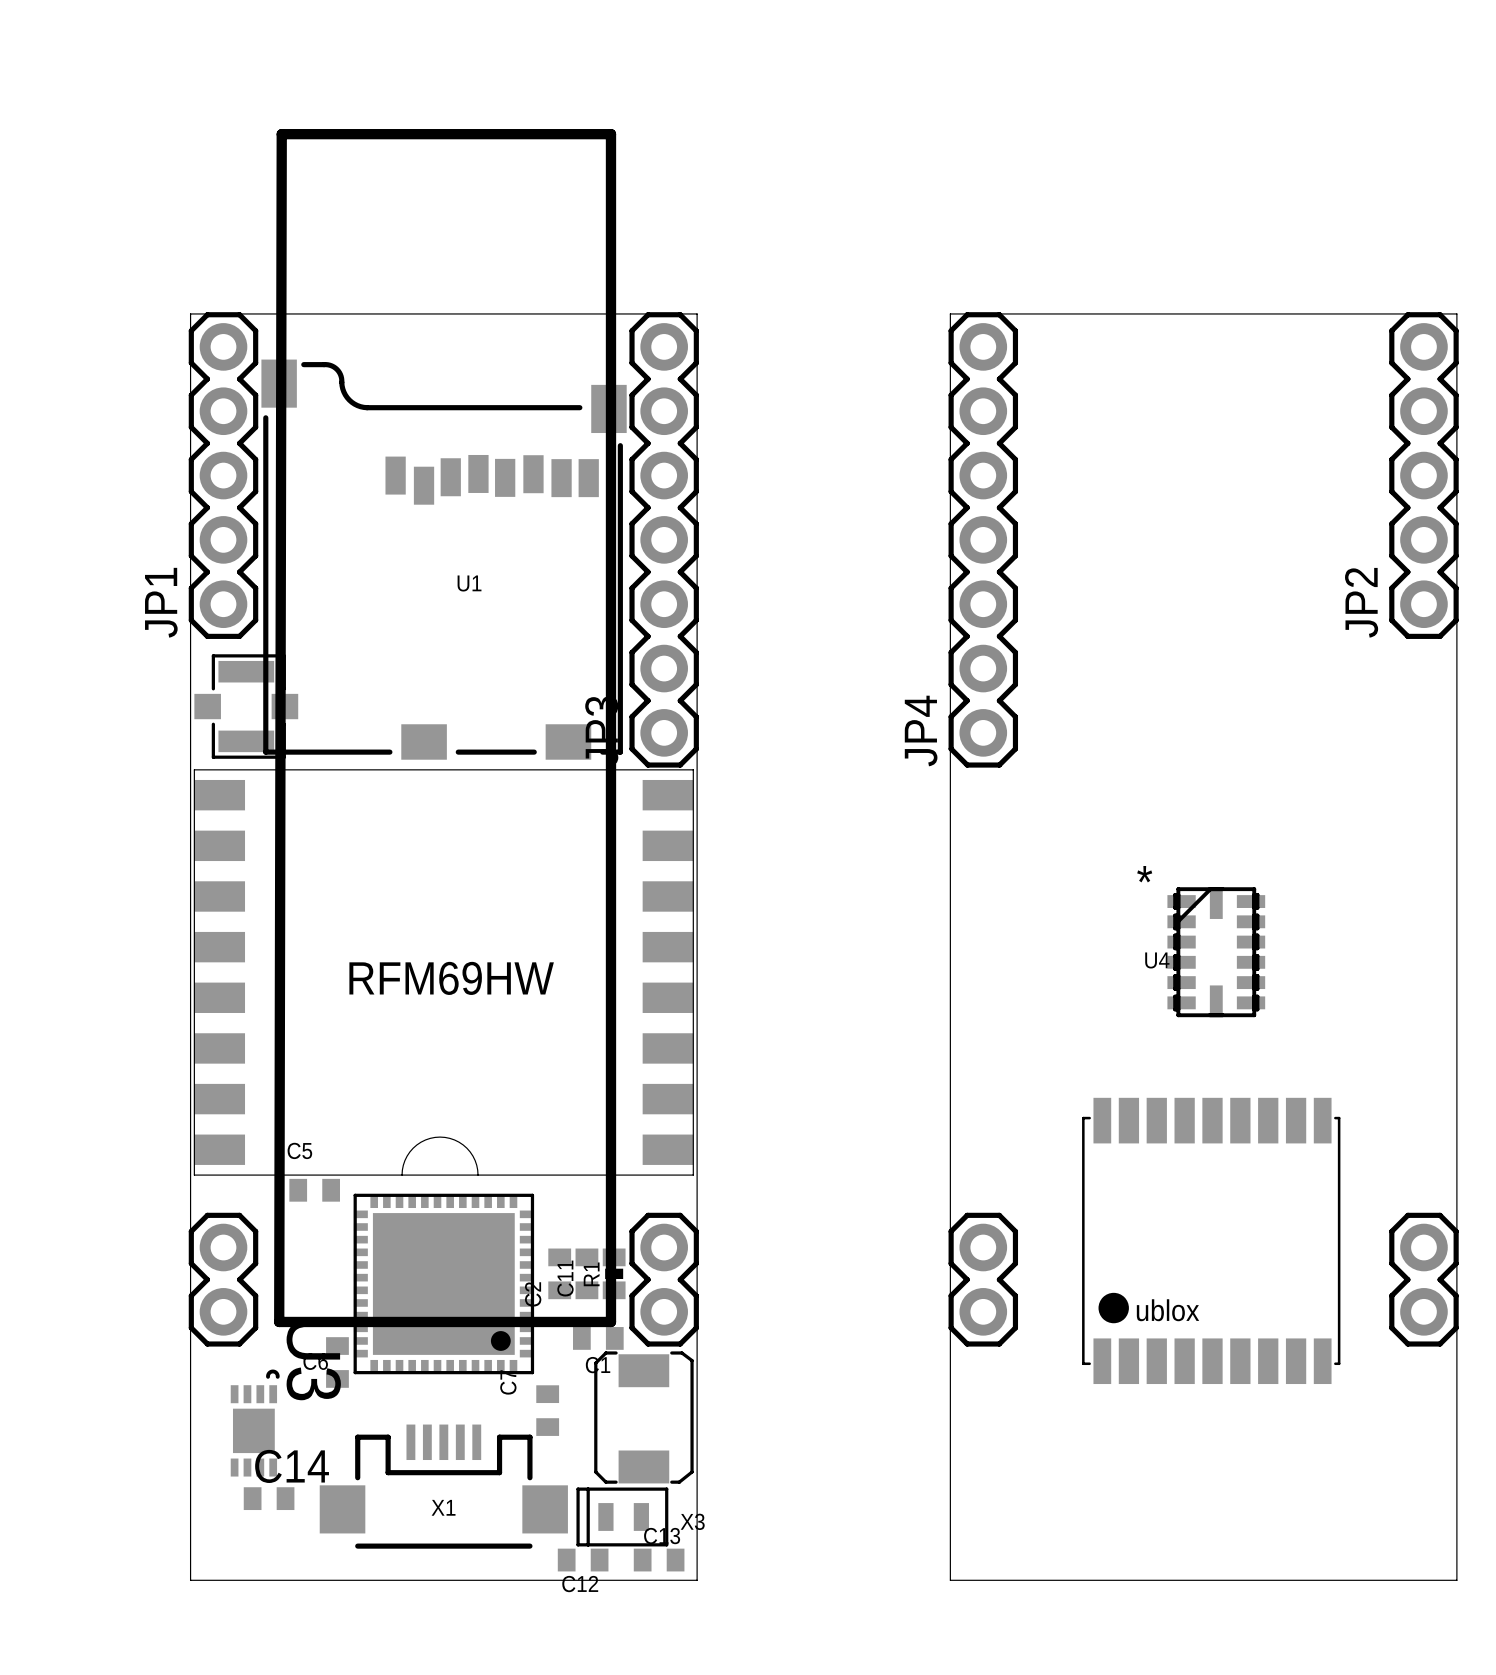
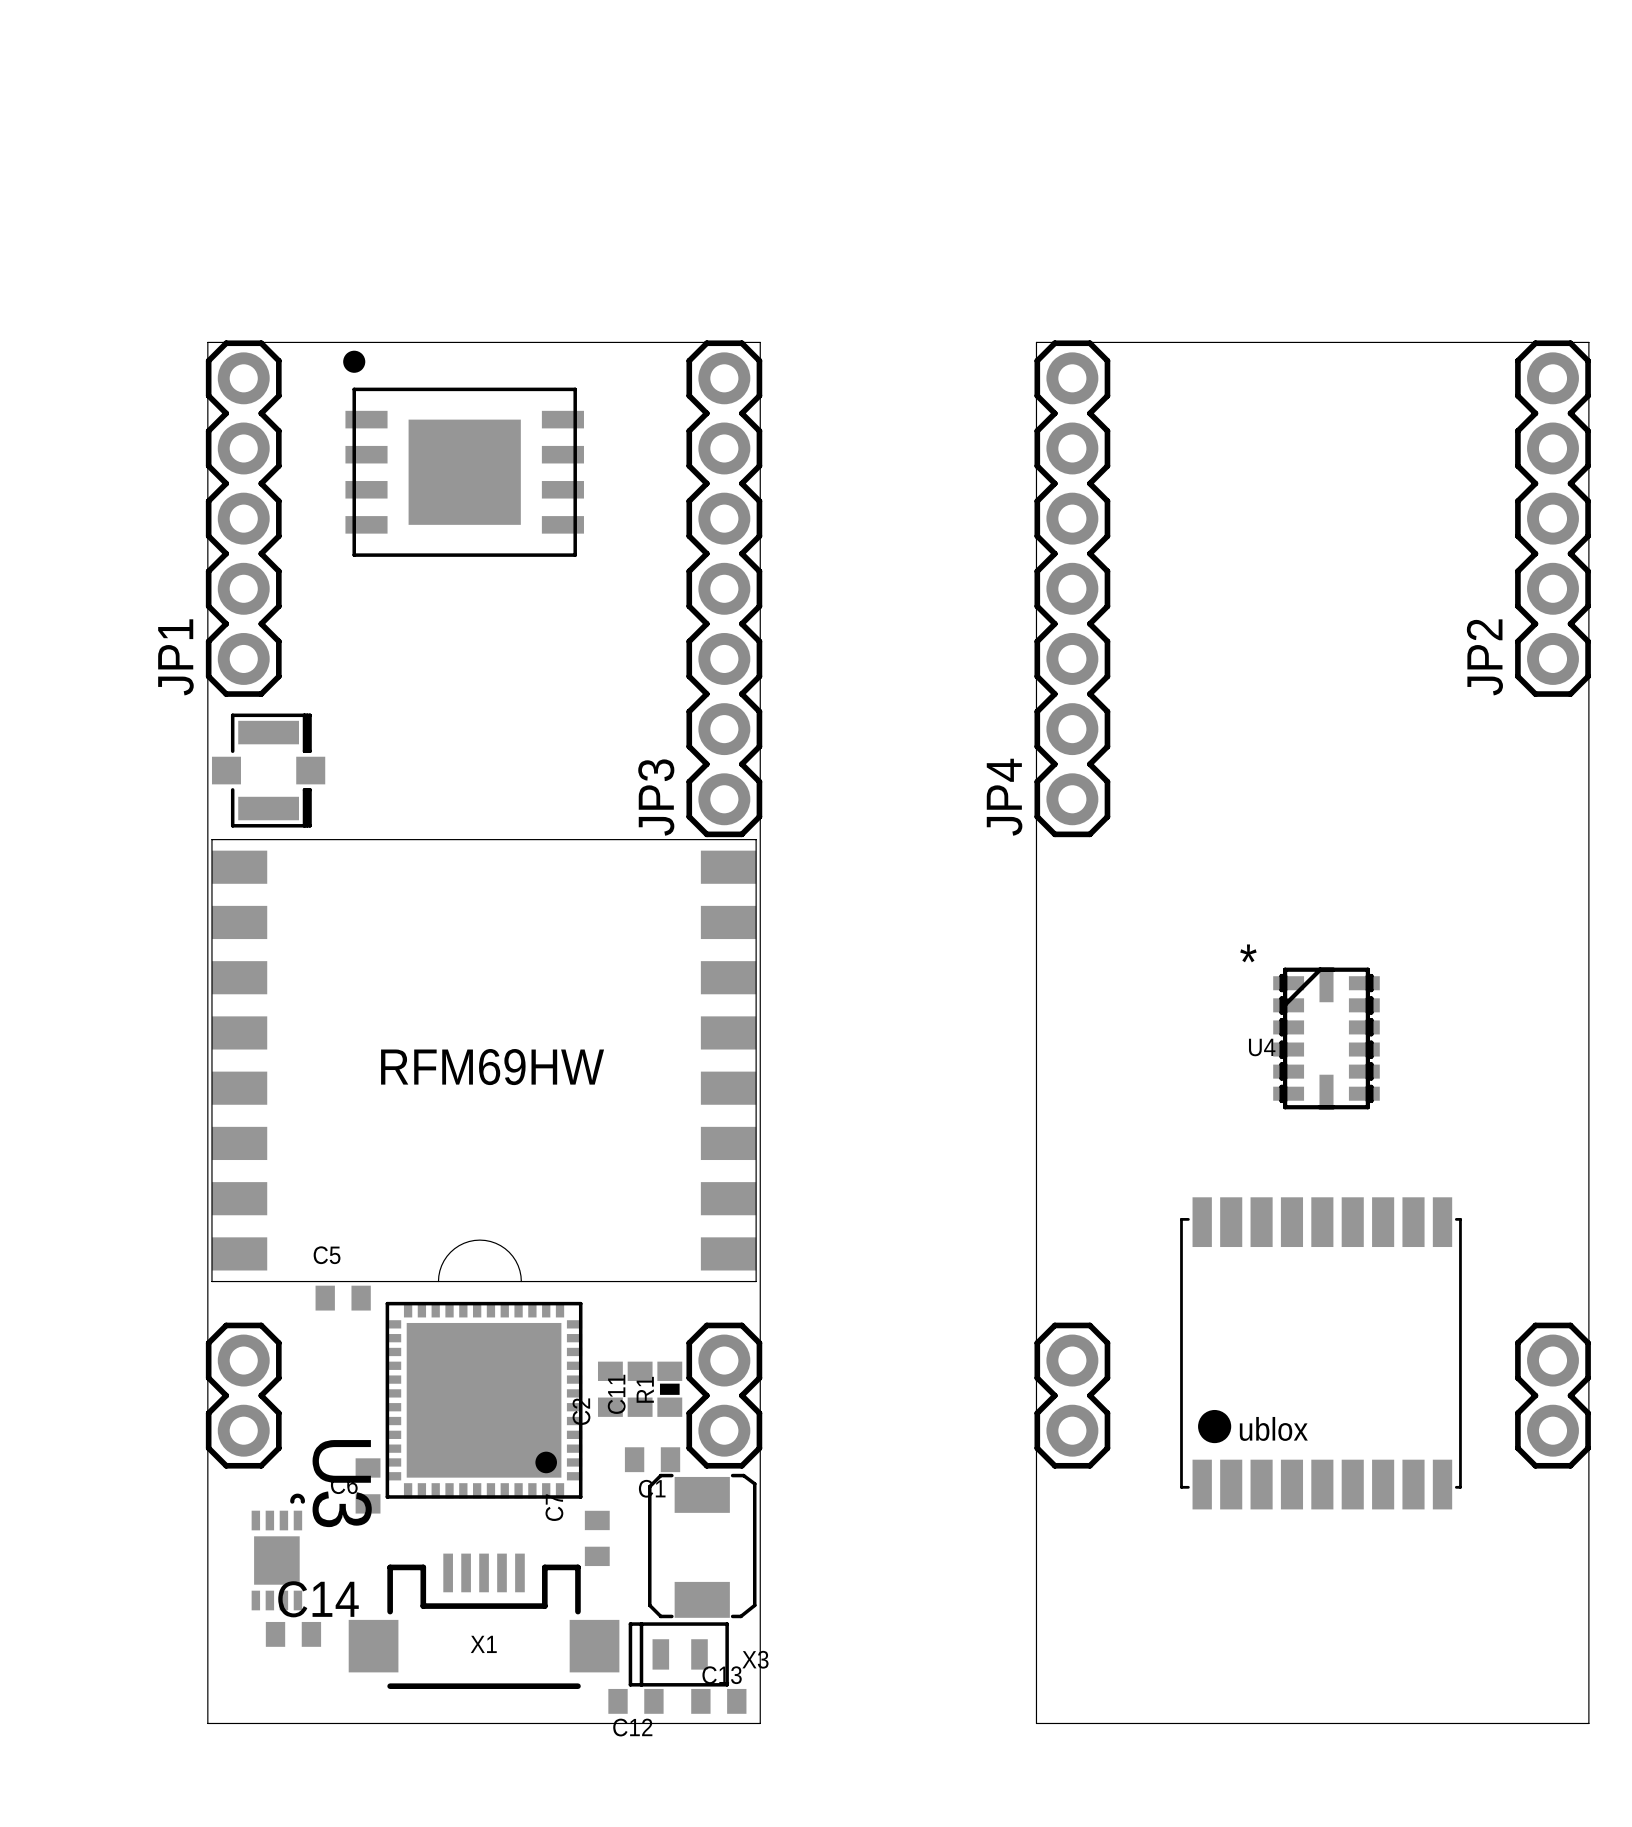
line: (281, 134) (610, 134) (610, 1321) (279, 1321) (281, 134) -> none
part: none -> (463, 453)
U1: (444, 559) -> none

